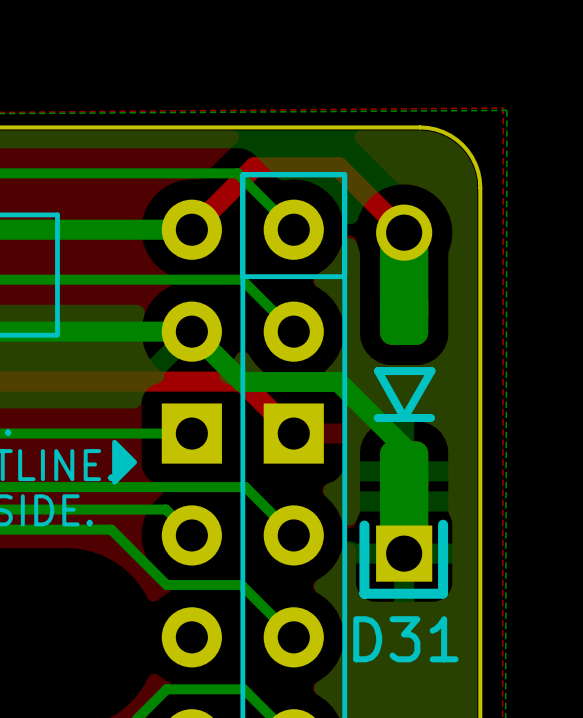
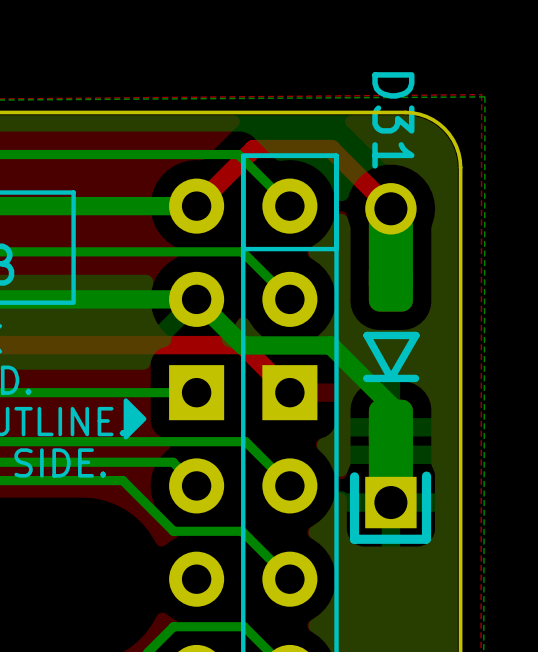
D31 name rotation: 0° (405, 639) -> 90° clockwise (393, 120)
D31 name position: D31 (405, 639) -> D31 (393, 120)

